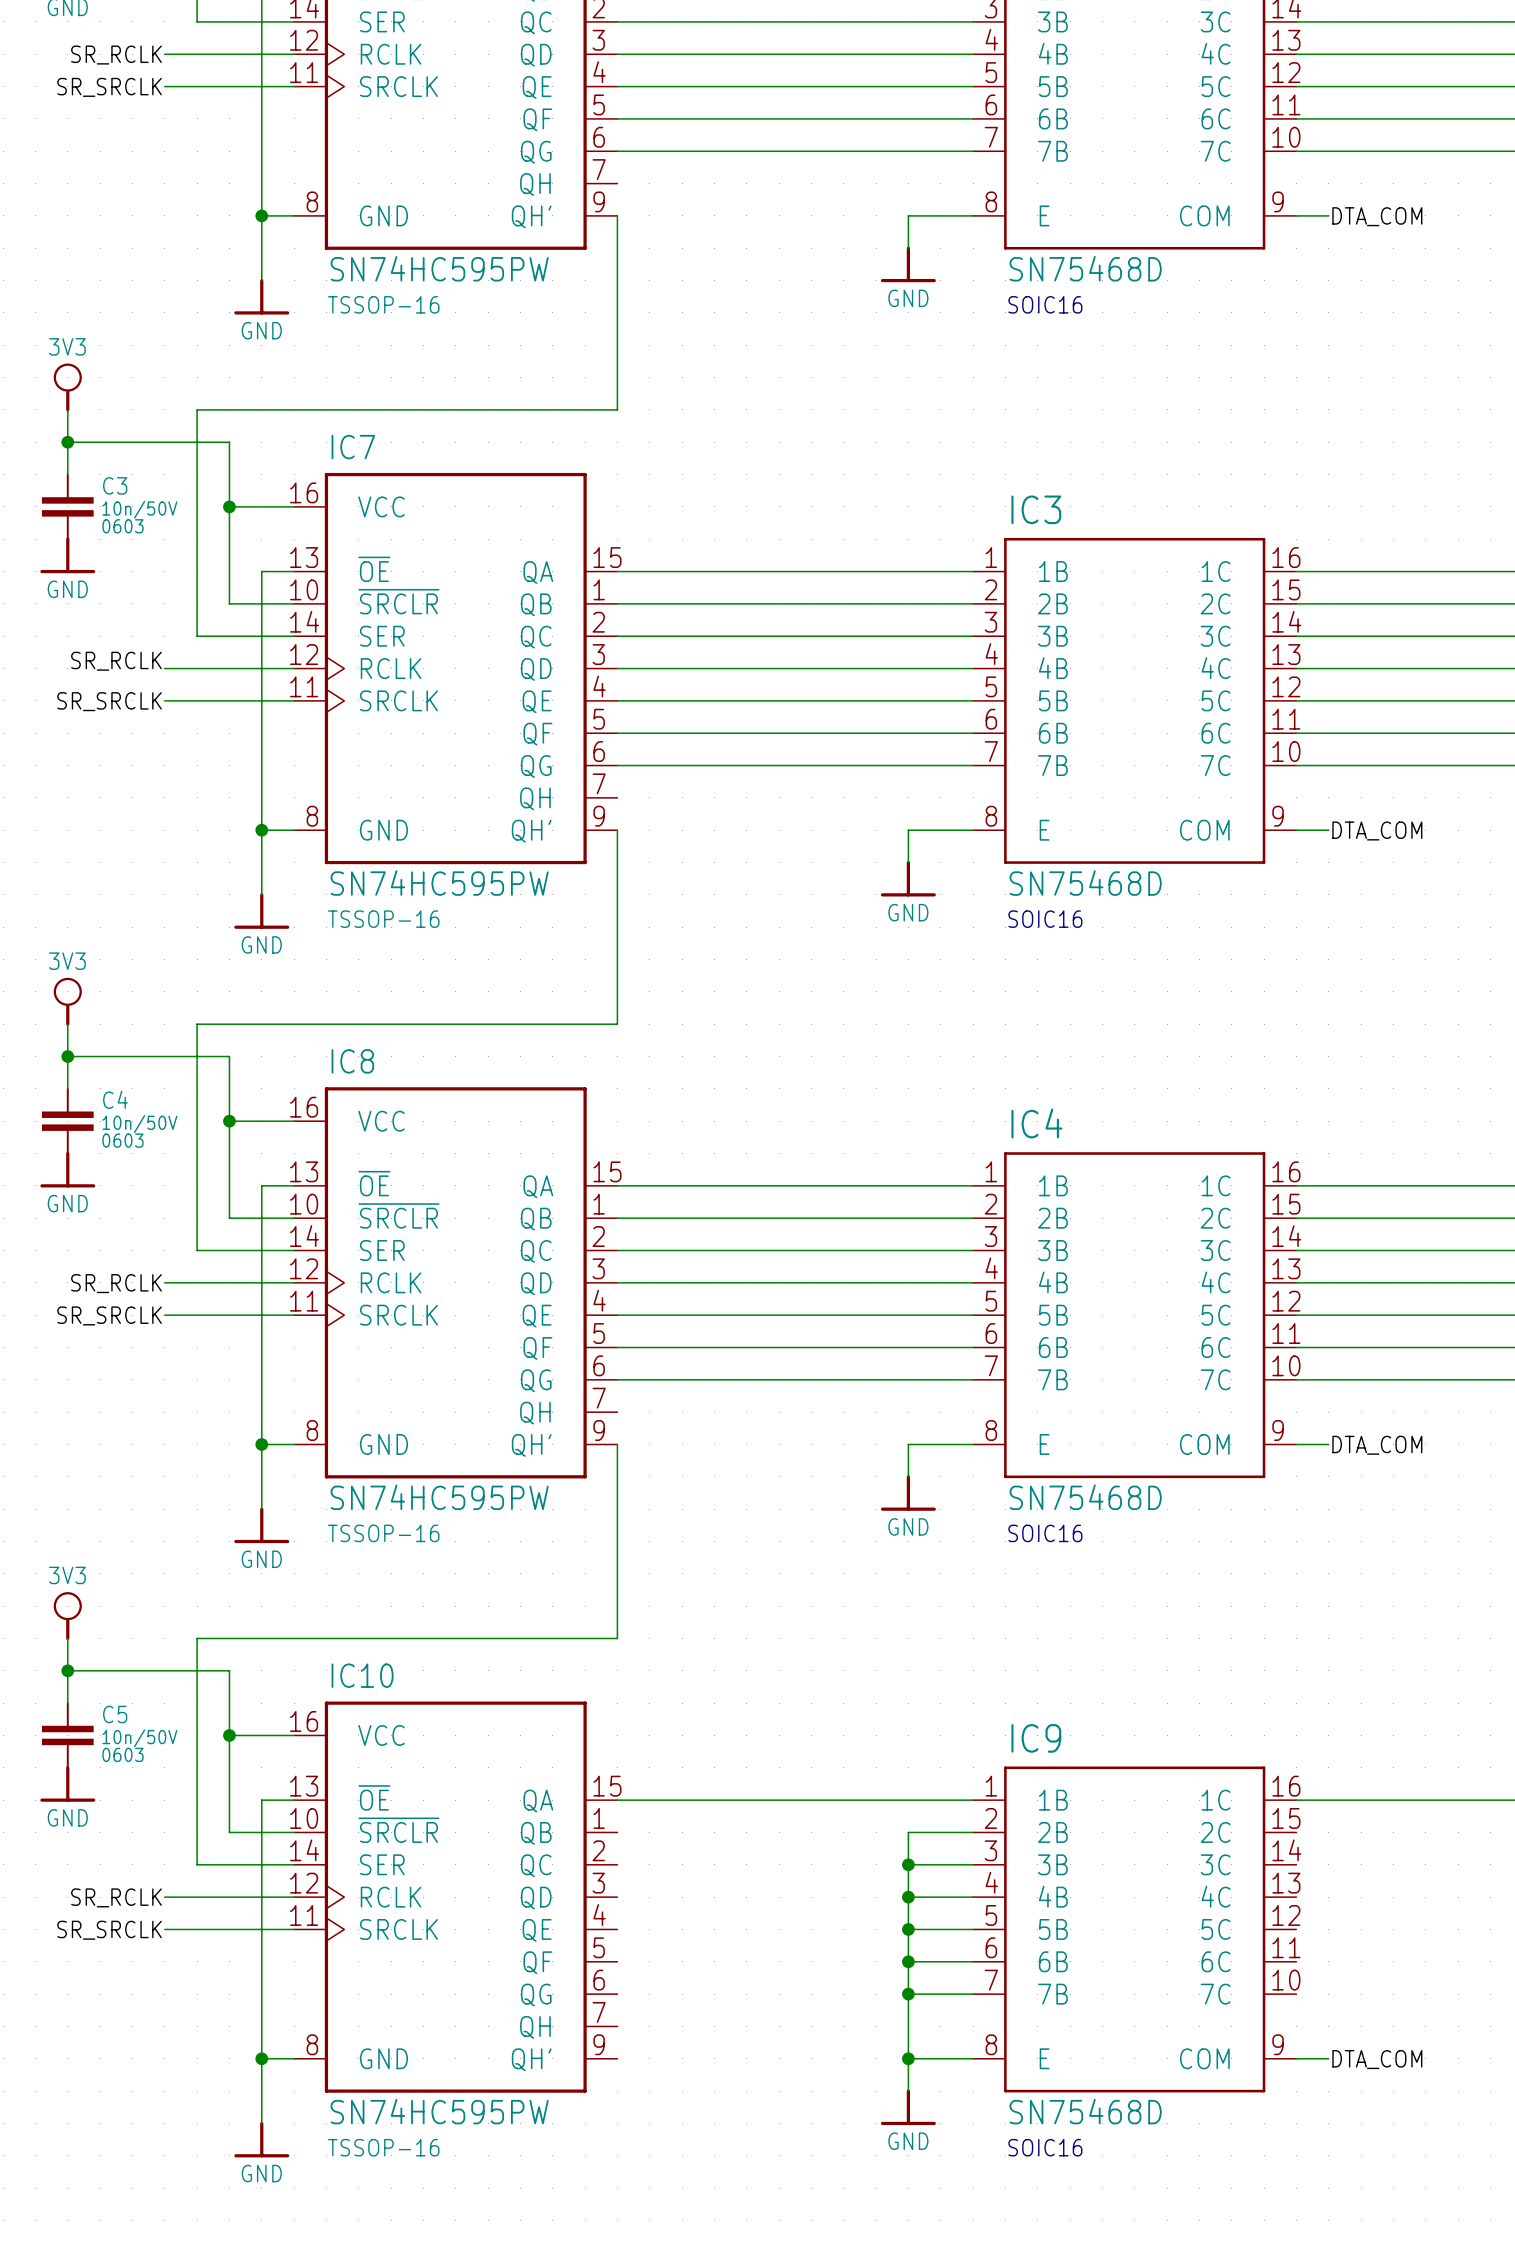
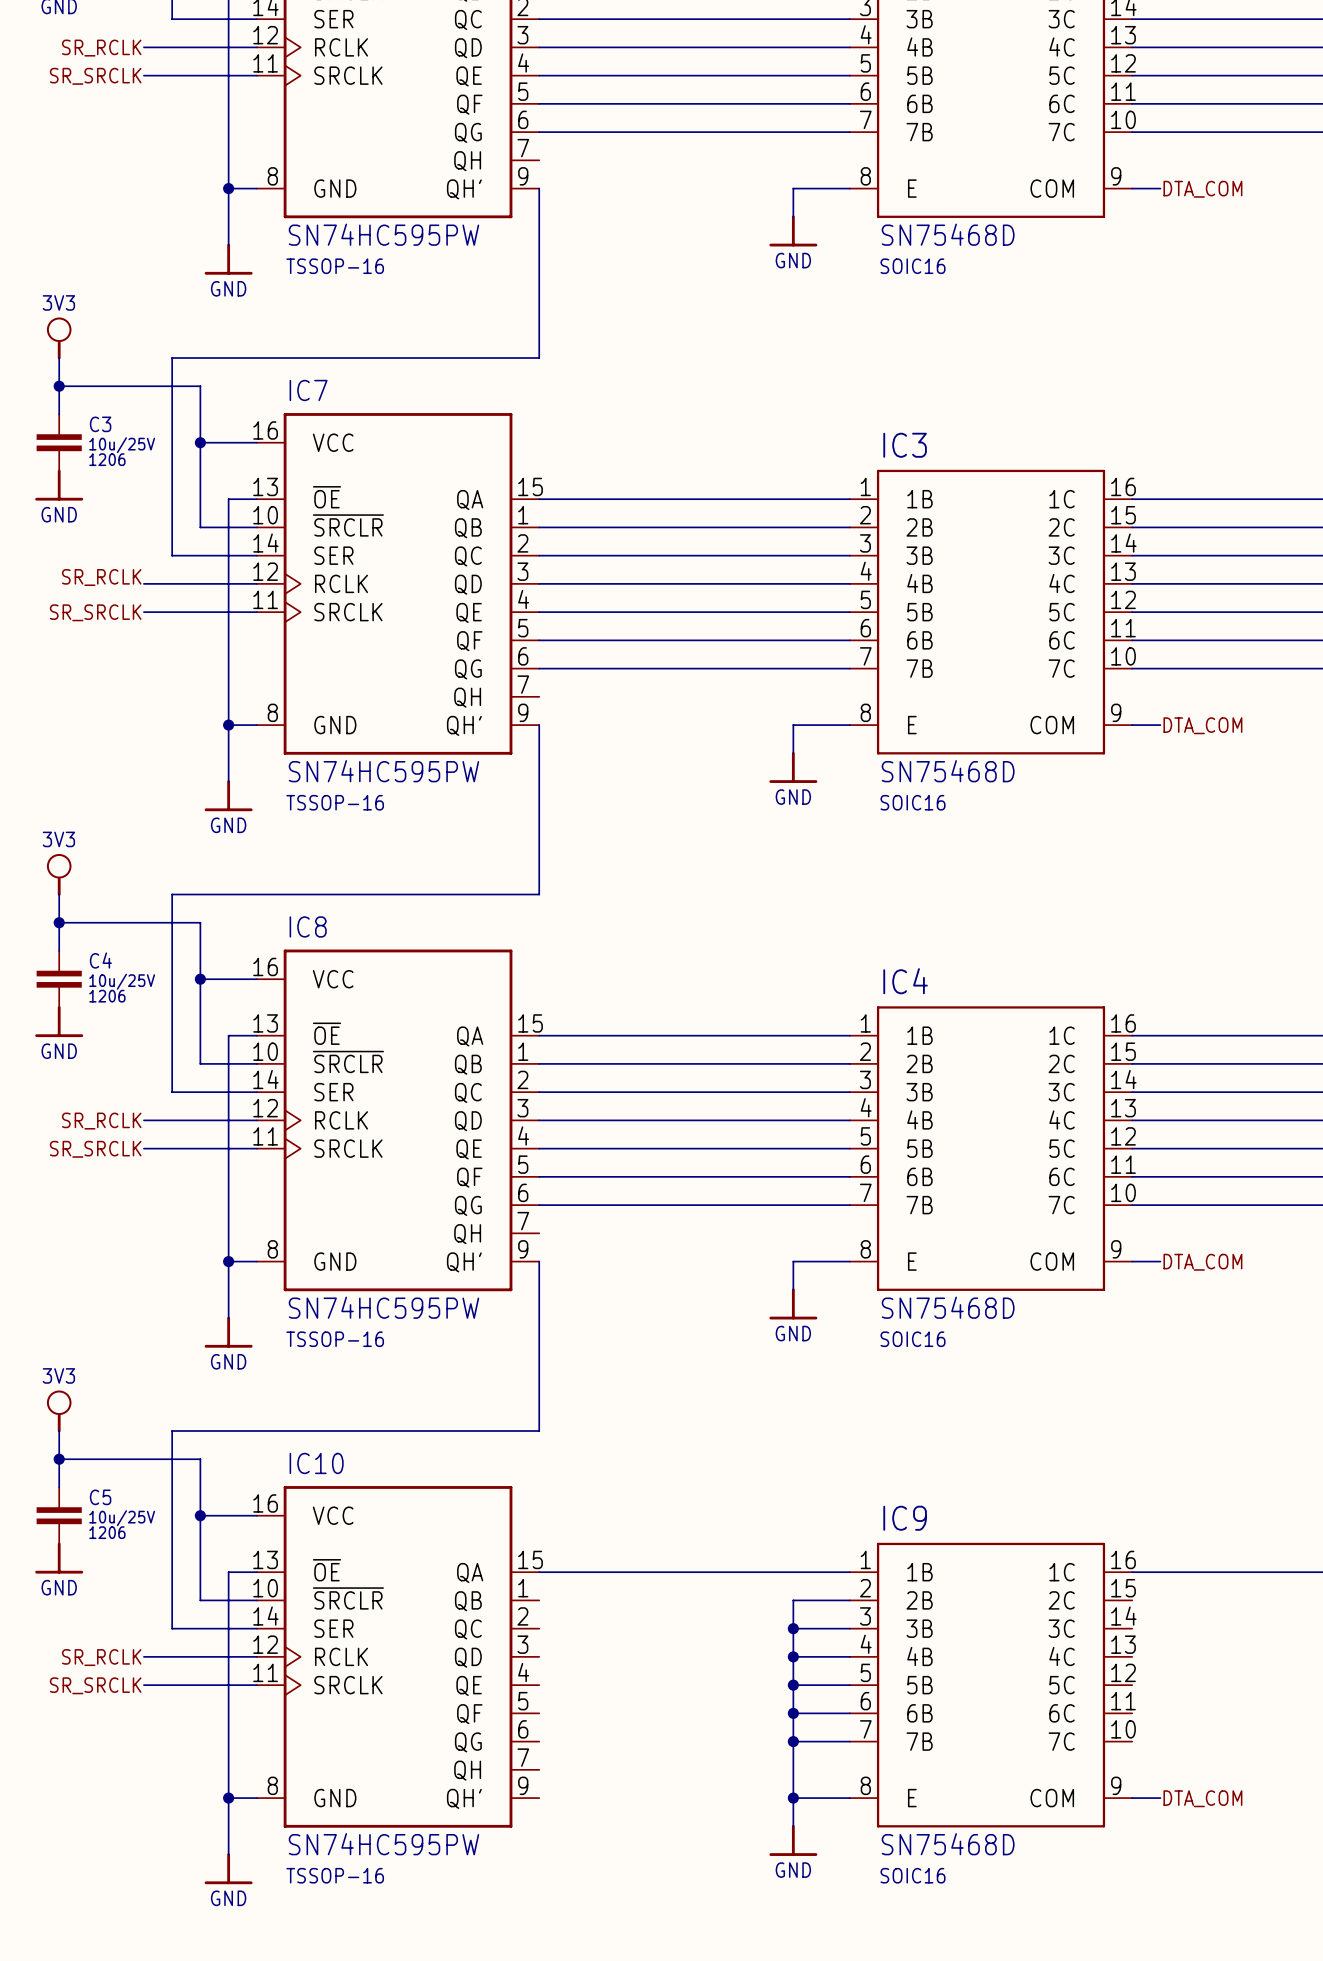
C3 value: 10n/50V (139, 509) -> 10u/25V (122, 445)
C3 text: 0603 (122, 526) -> 1206 (107, 459)
C4 value: 10n/50V (139, 1124) -> 10u/25V (122, 981)
C4 text: 0603 (122, 1140) -> 1206 (107, 996)
C5 value: 10n/50V (139, 1738) -> 10u/25V (122, 1518)
C5 text: 0603 (122, 1754) -> 1206 (107, 1532)

